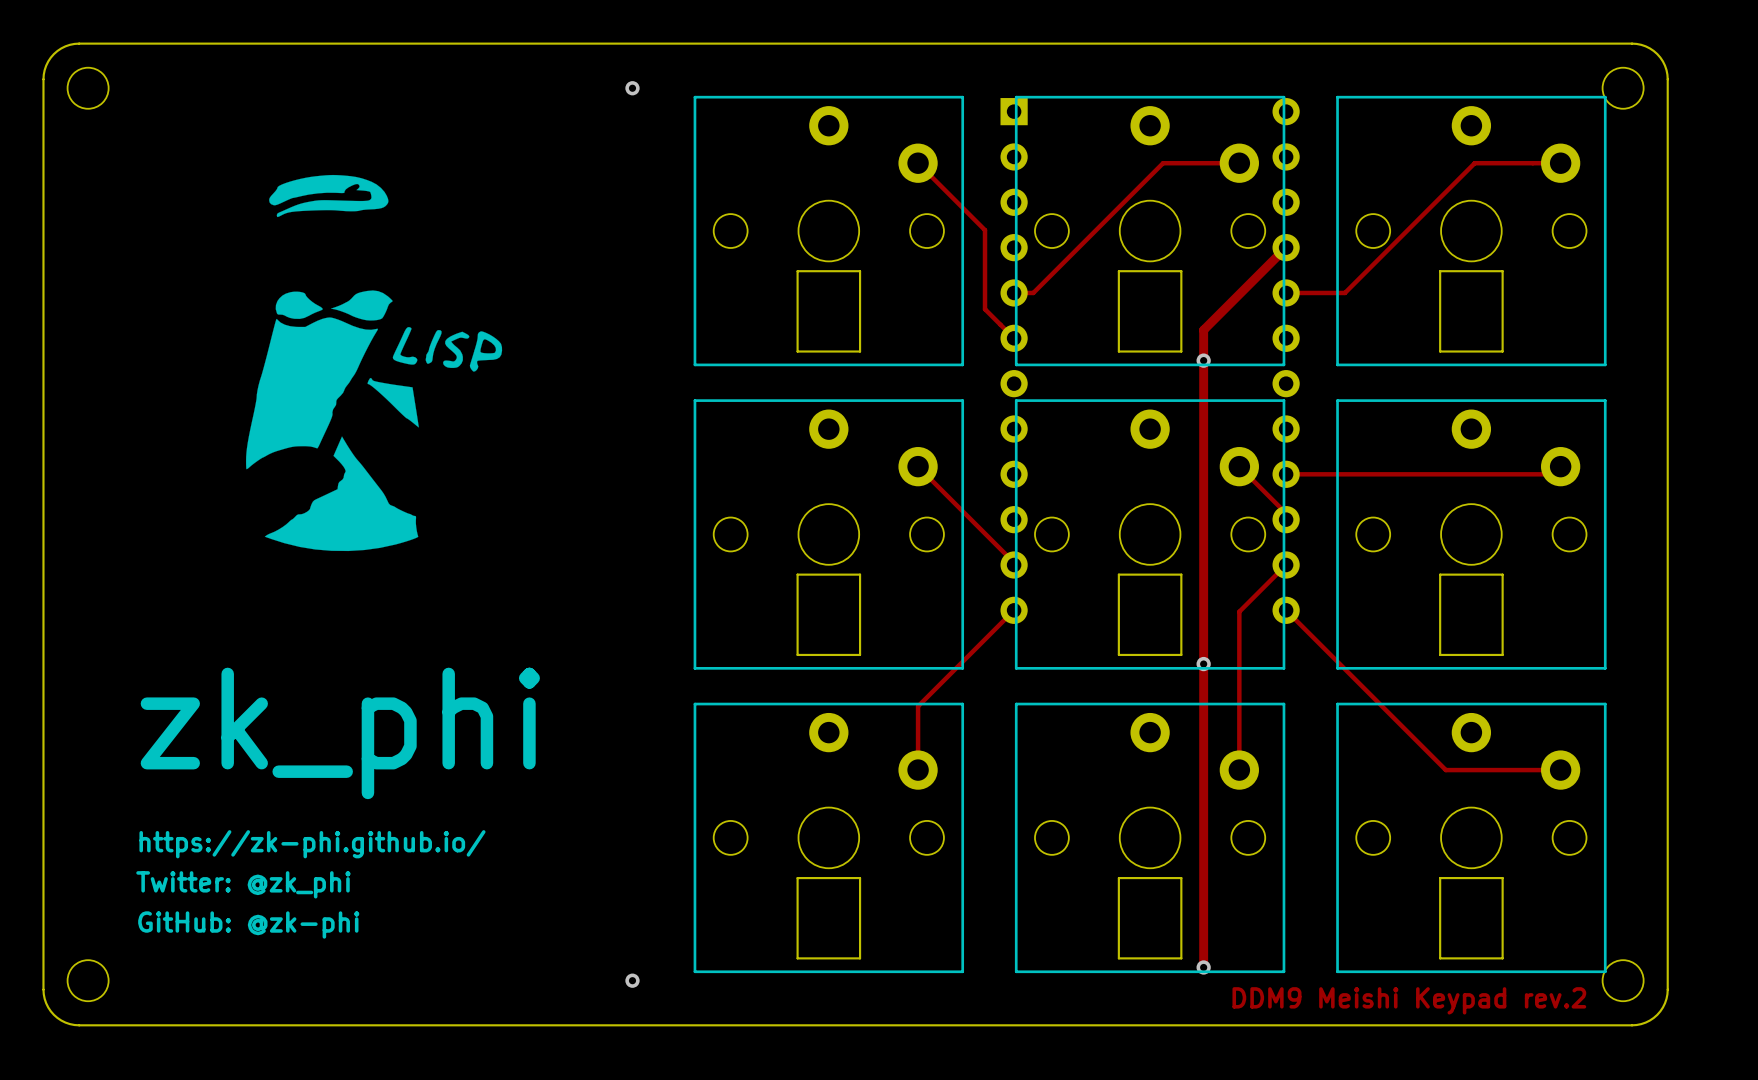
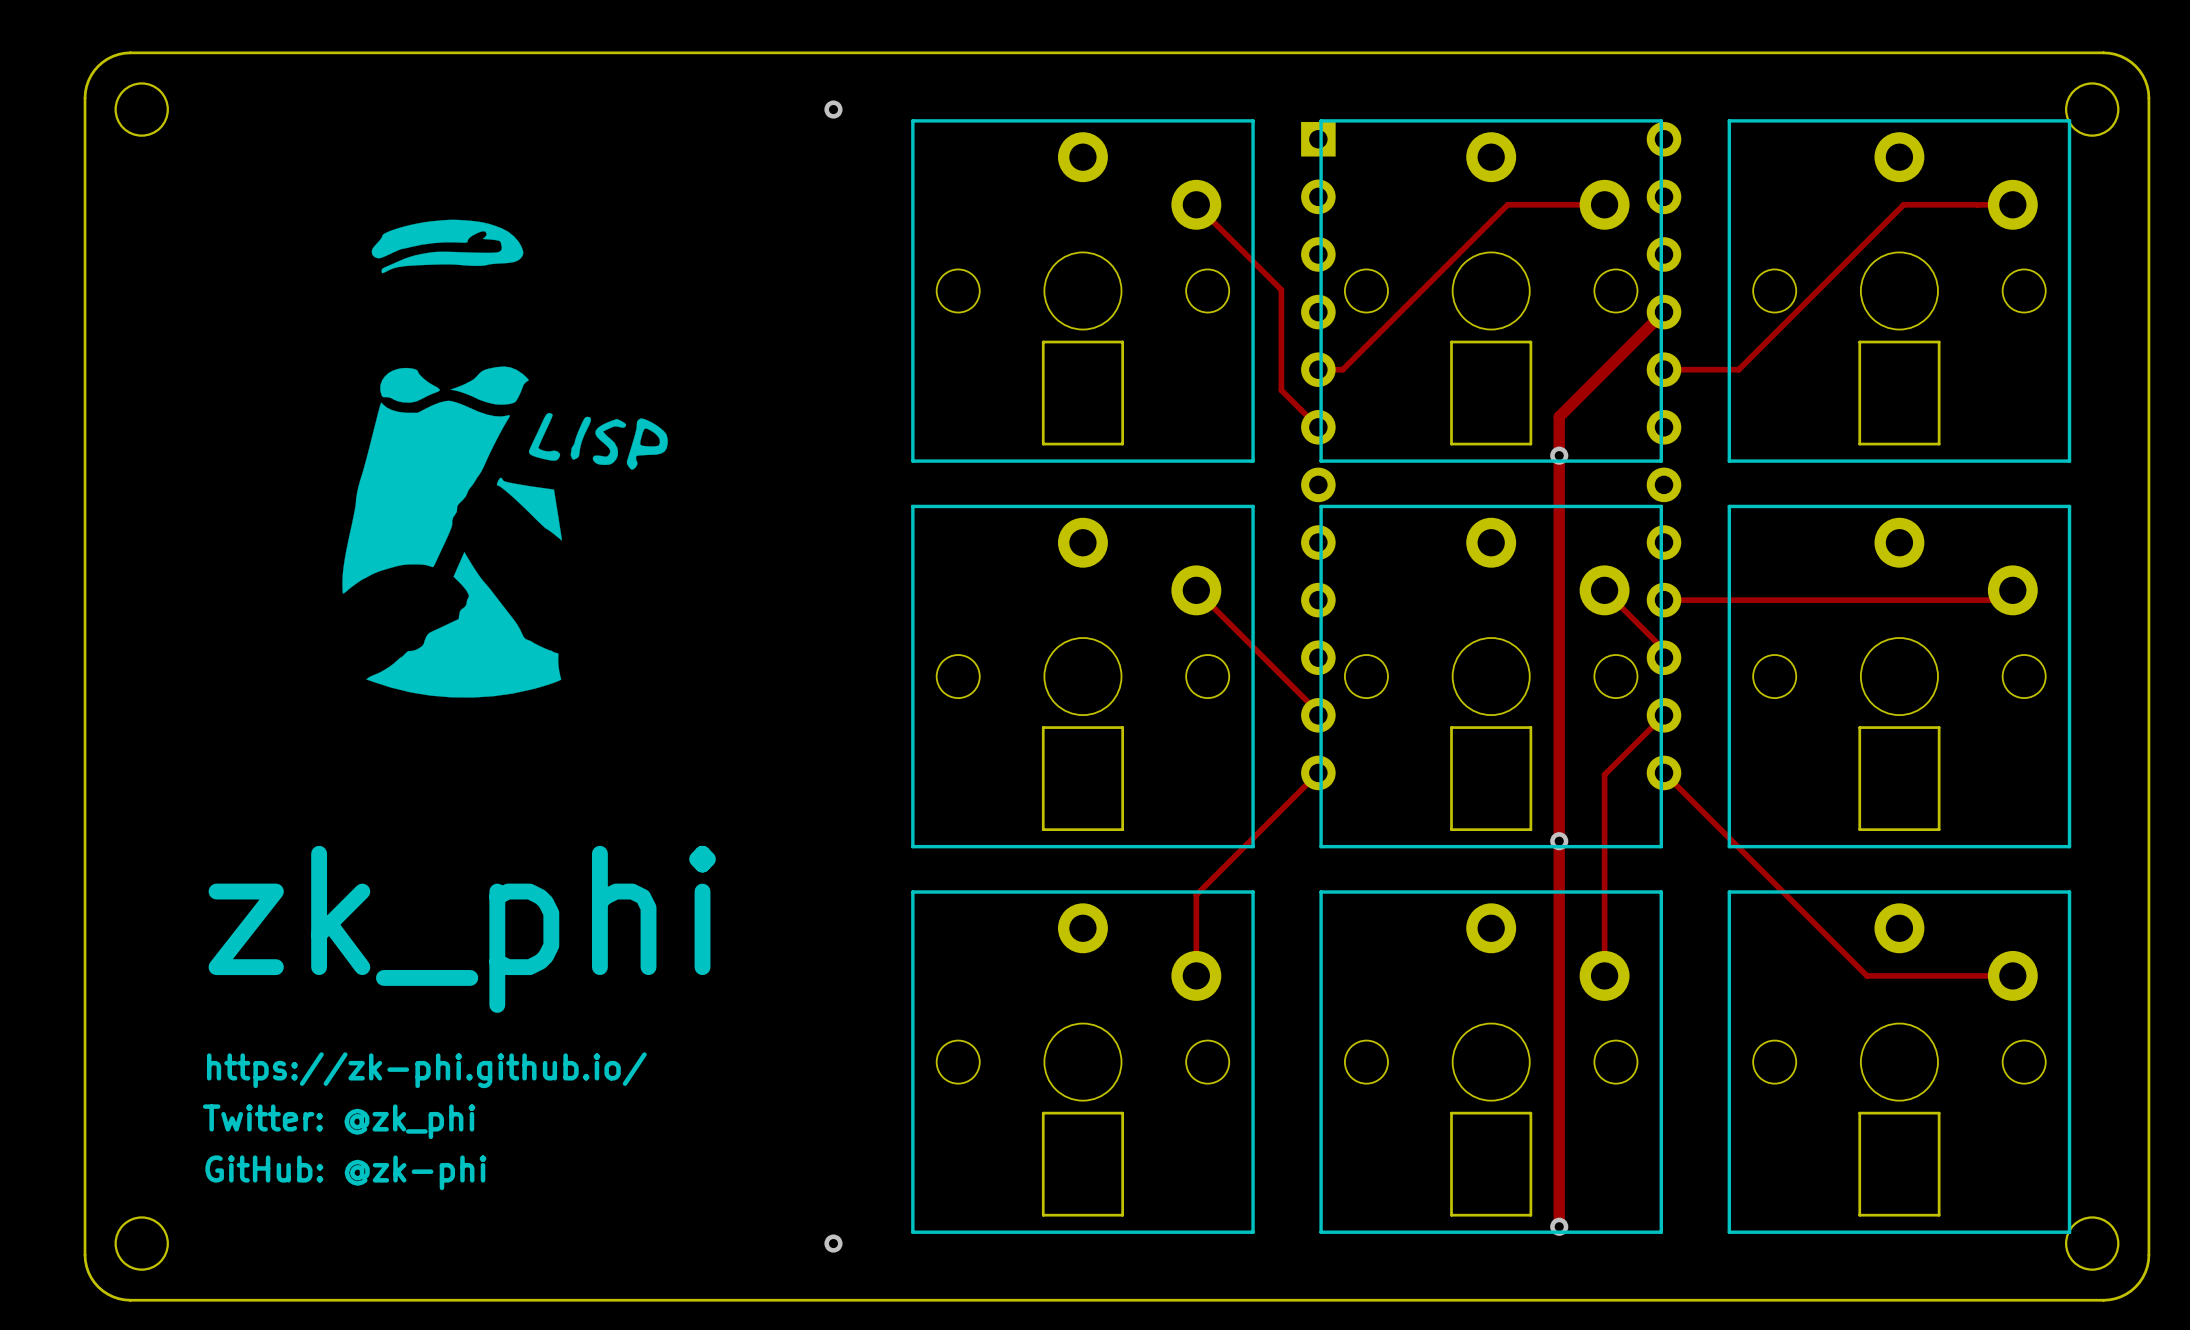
text: DDM9 Meishi Keypad rev.2 (1409, 1000) -> none

